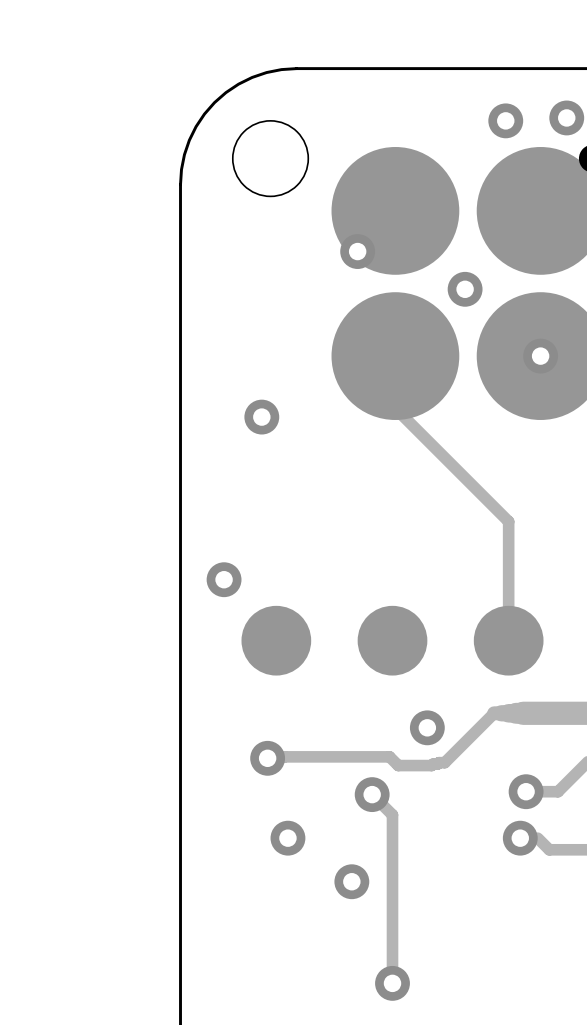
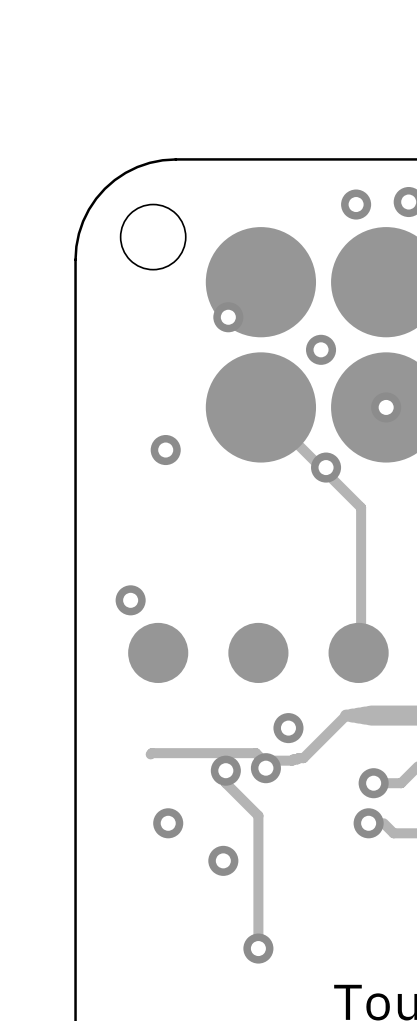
track: (395, 356) (395, 408) (508, 521) (508, 640) -> (260, 407) (361, 507) (361, 650) (358, 652)
via position: (261, 417) -> (165, 450)
via: none -> (326, 467)
via position: (224, 579) -> (130, 600)
via: (267, 758) -> none
via: none -> (265, 768)
via: none -> (225, 770)
track: (372, 794) (392, 814) (392, 829) -> (225, 770) (225, 783) (258, 815)
via: (372, 794) -> none

